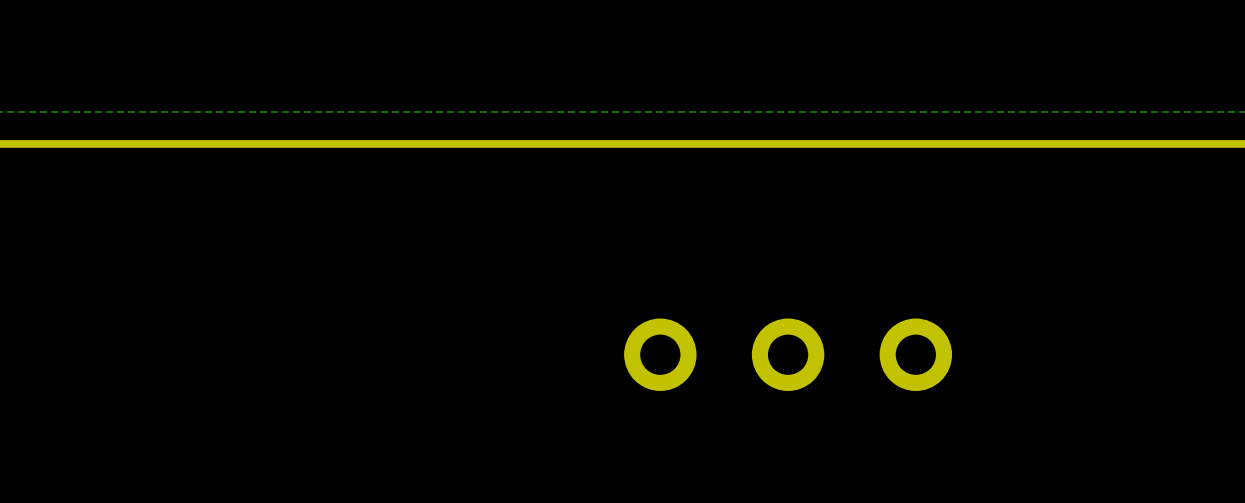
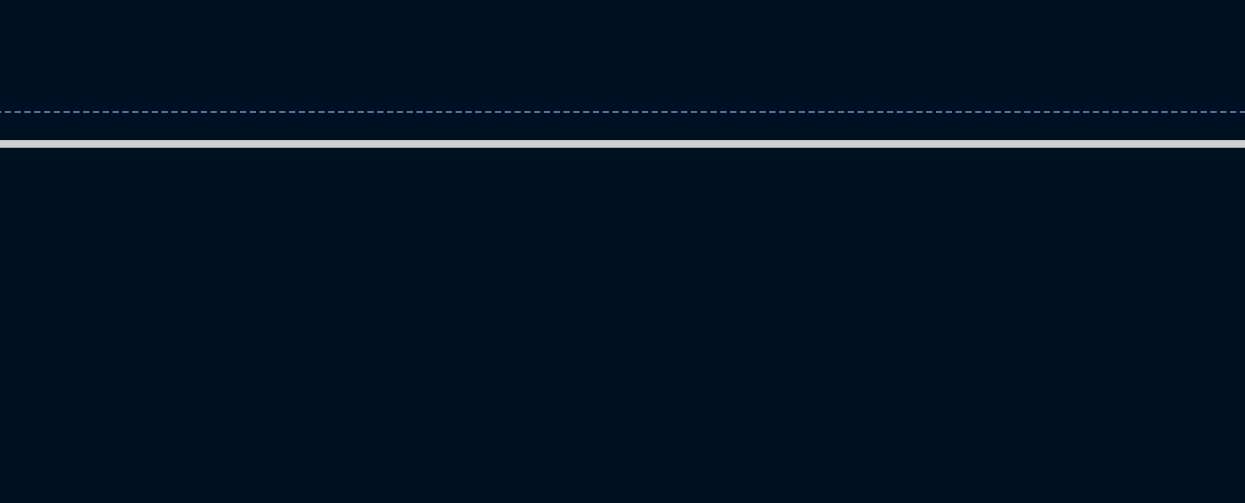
part: (788, 354) -> none

